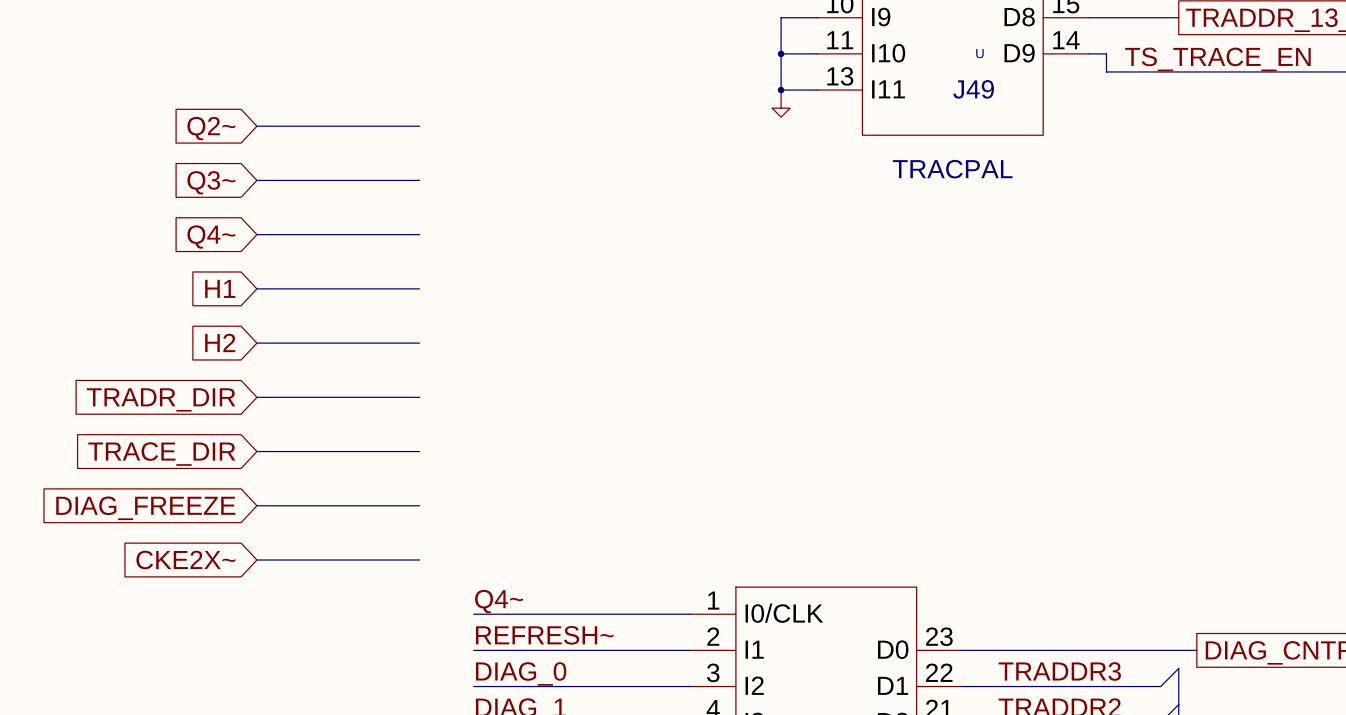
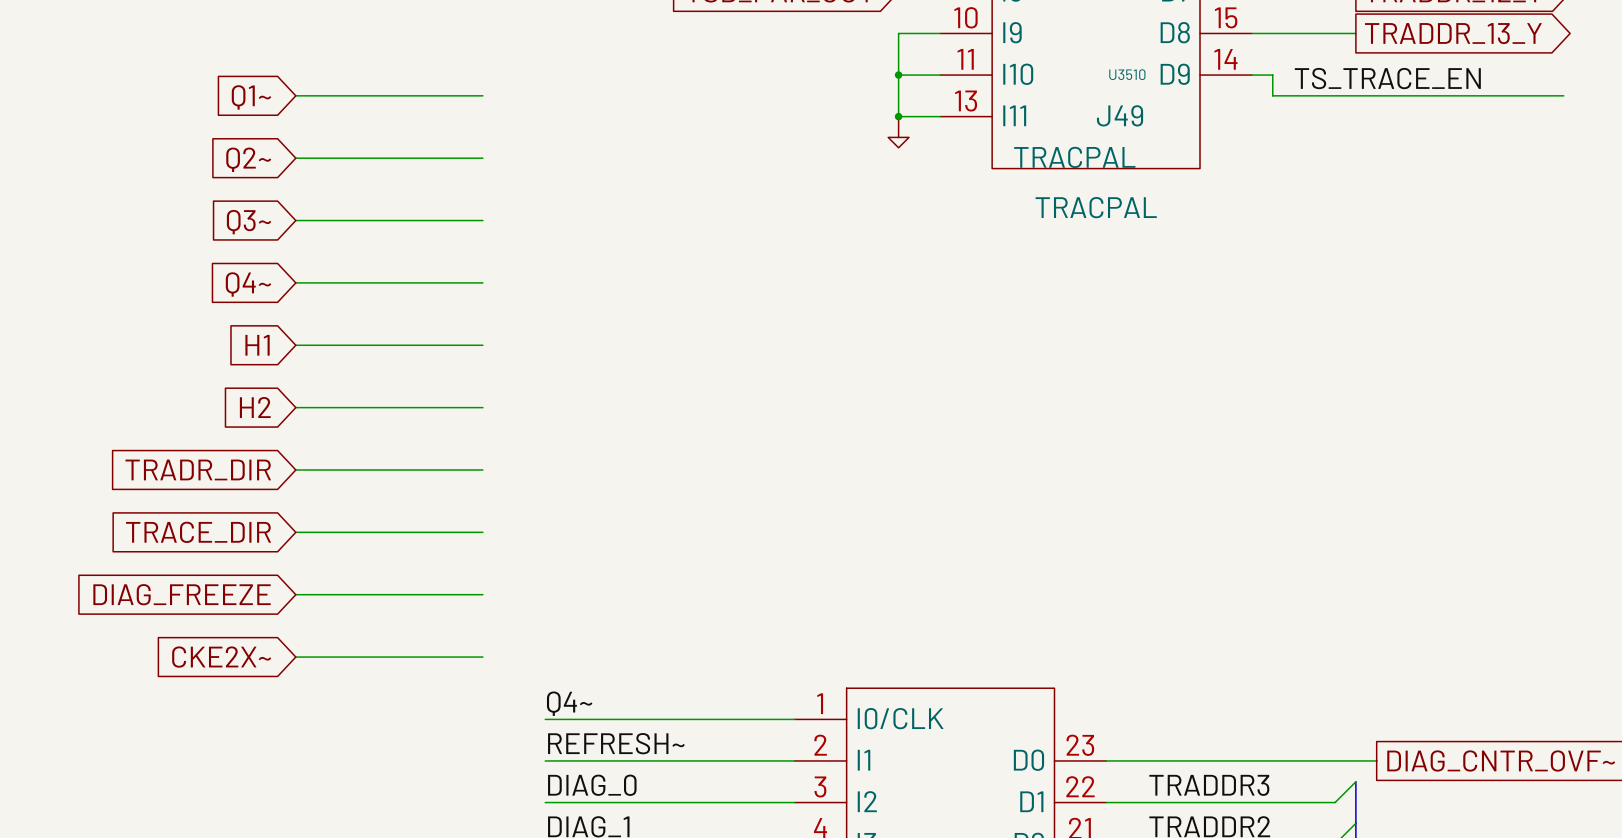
U name: U (979, 53) -> U3510 (1127, 74)
wire: none -> (295, 95) (482, 95)
global label: none -> Q1~ (251, 97)
U value: none -> TRACPAL (1074, 157)

